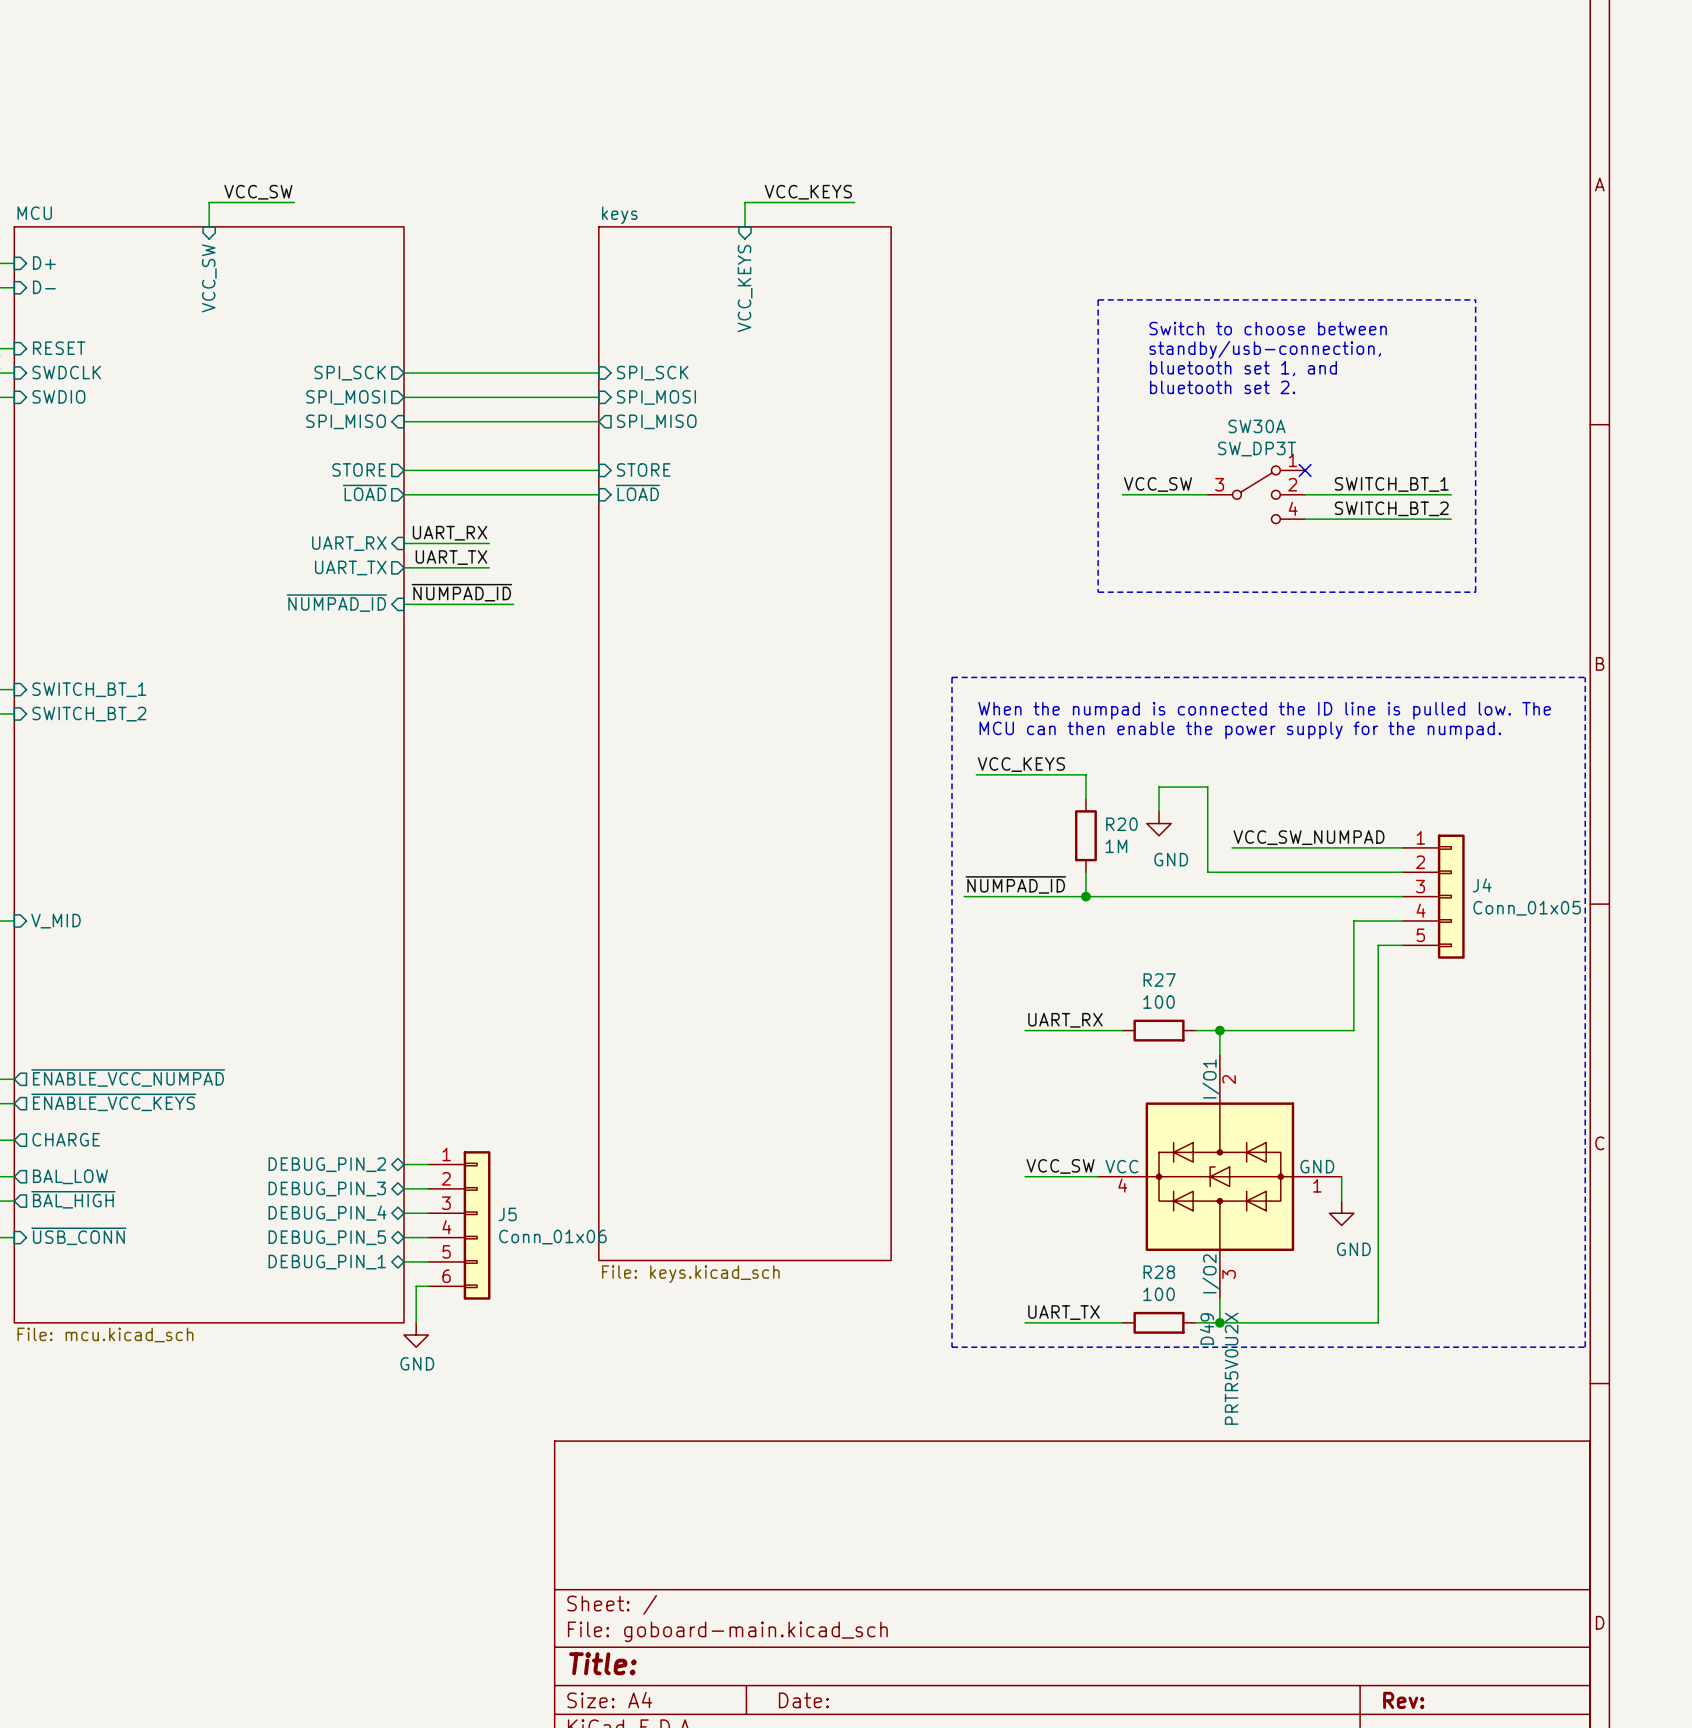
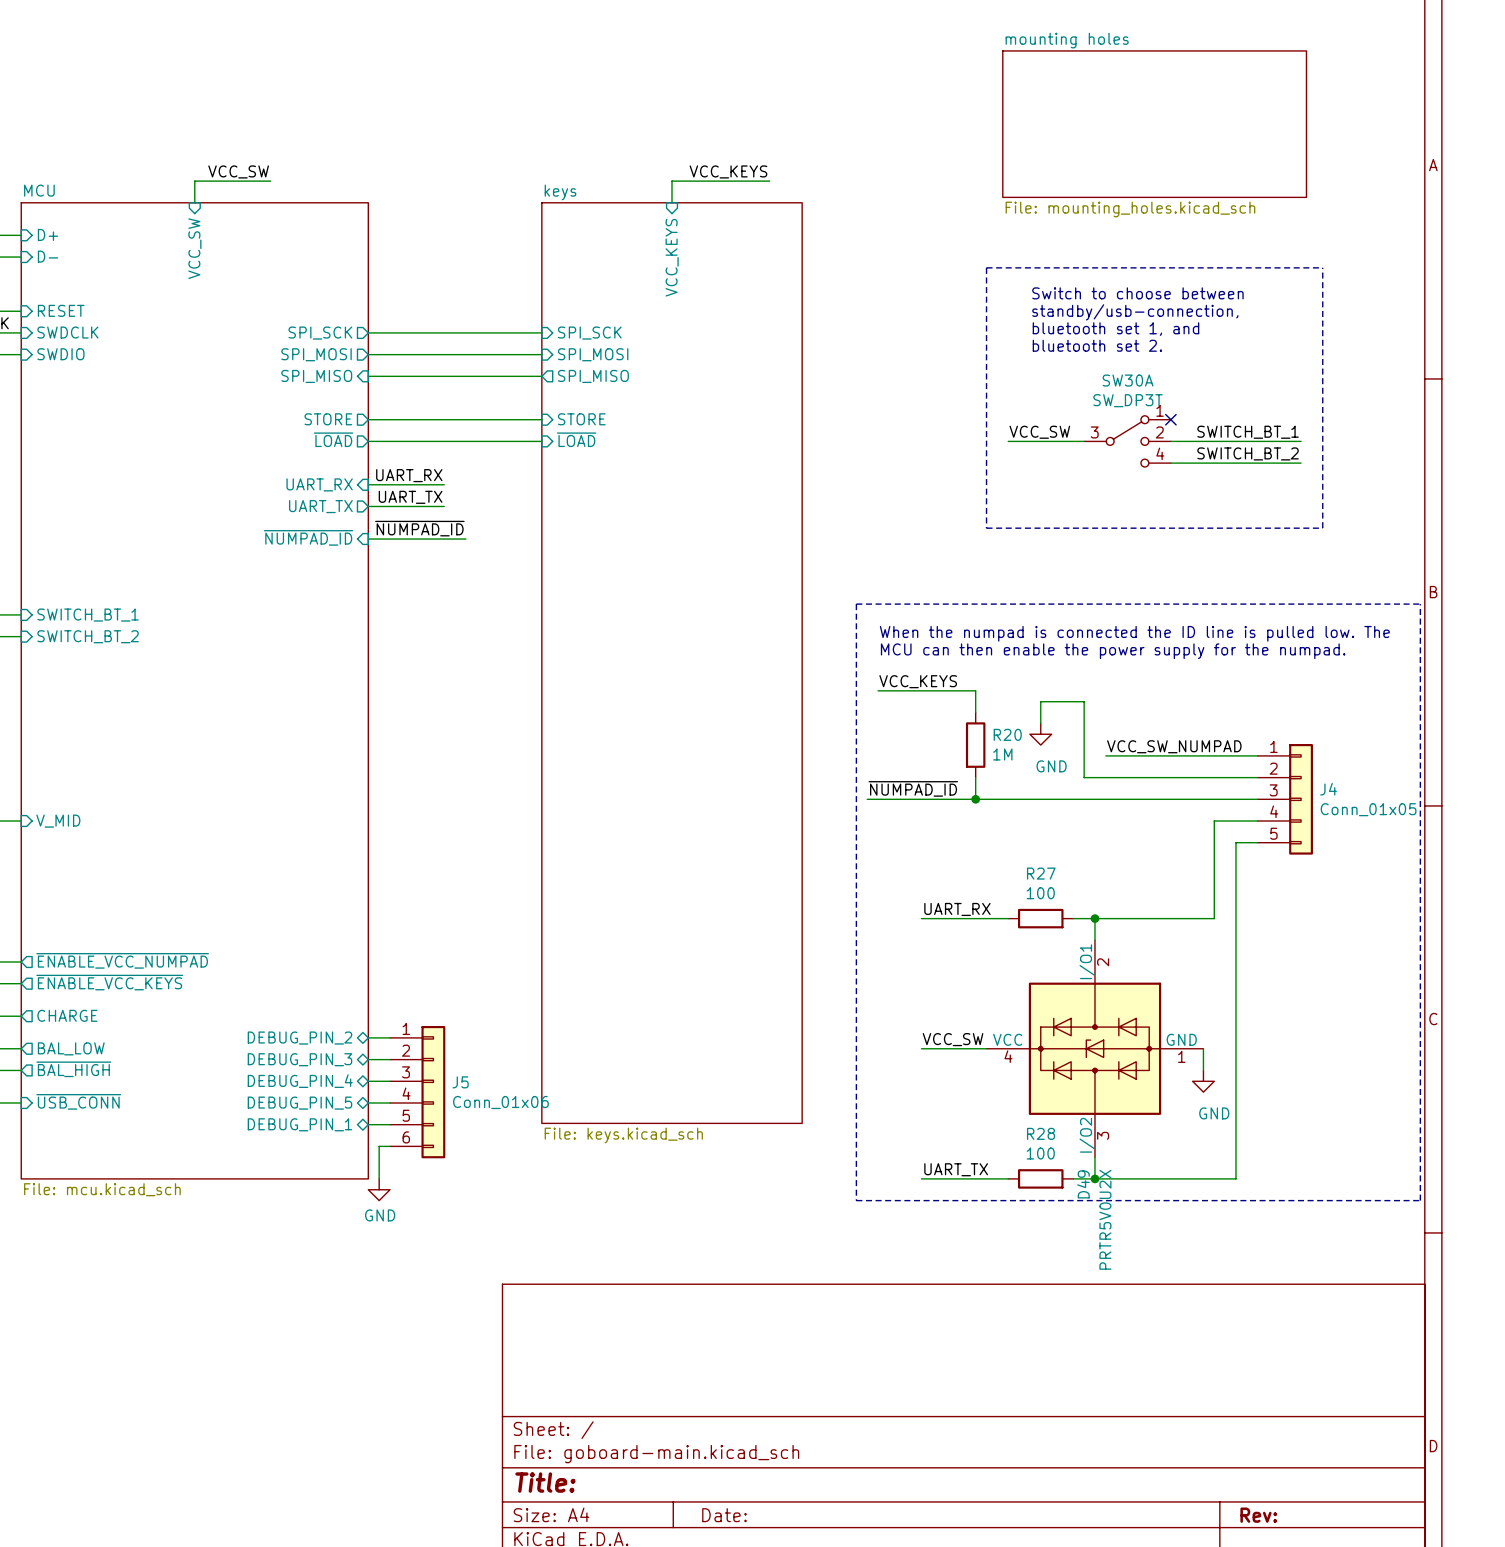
sheet mounting holes: none -> File: mounting_holes.kicad_sch (1154, 124)

